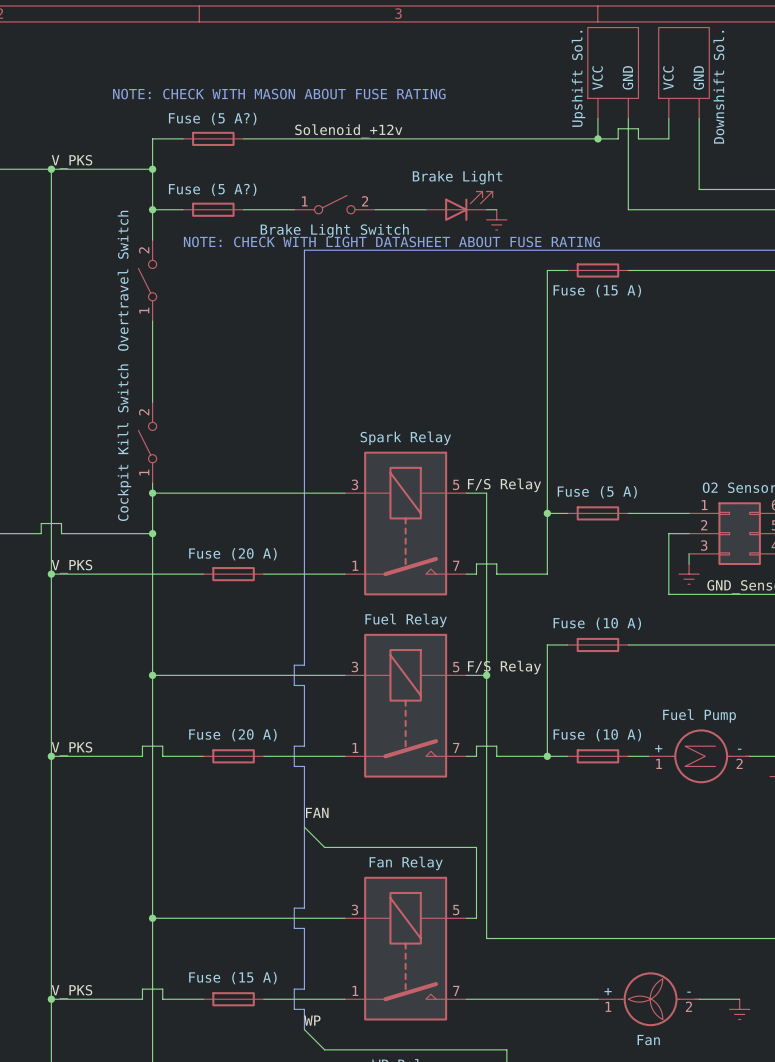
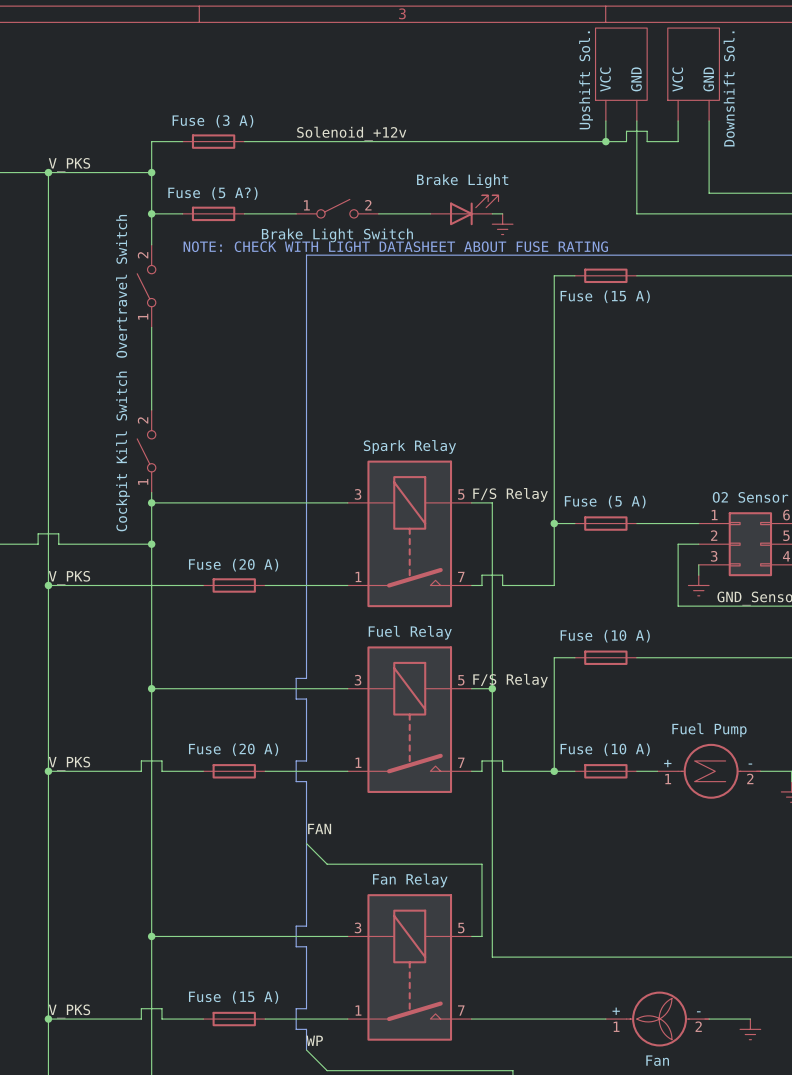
text: NOTE: CHECK WITH MASON ABOUT FUSE RATING (279, 94) -> none
part value: Fuse (5 A?) (212, 118) -> Fuse (3 A) (212, 121)

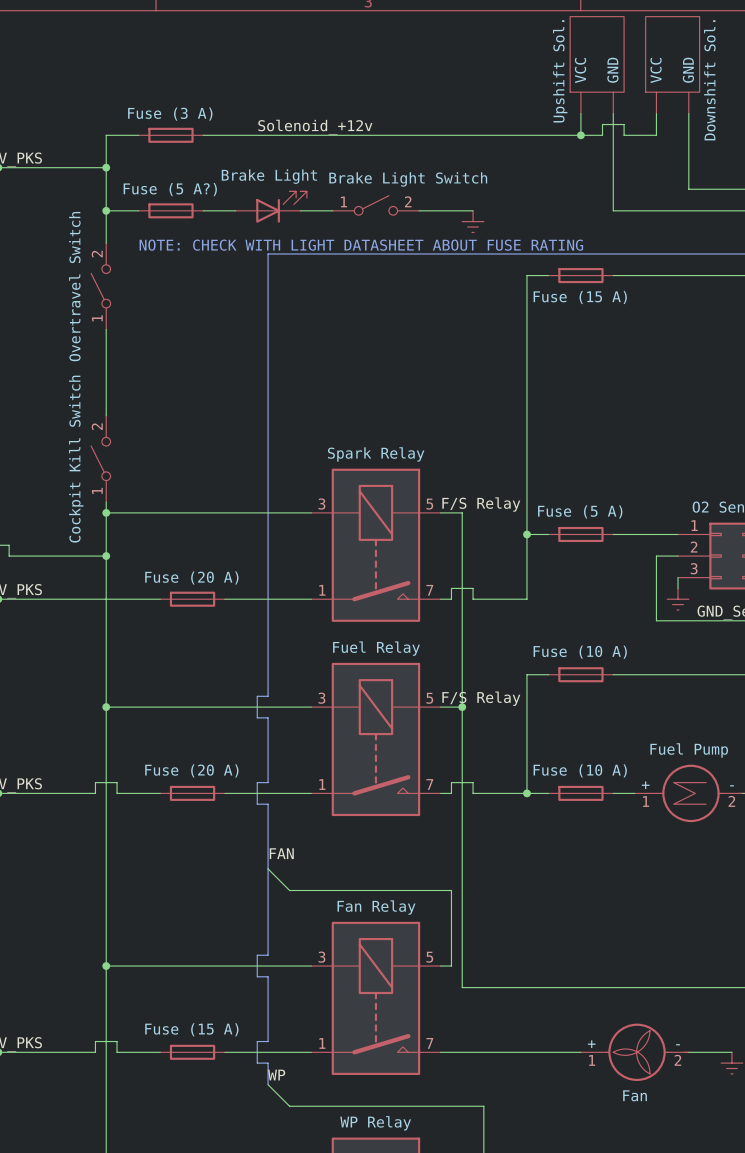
part position: (337, 208) -> (375, 205)
part position: (464, 210) -> (271, 207)
wire: none -> (300, 210) (332, 210)
wire: (378, 213) (430, 213) -> none
part value position: Brake Light Switch (337, 235) -> Brake Light Switch (408, 179)

